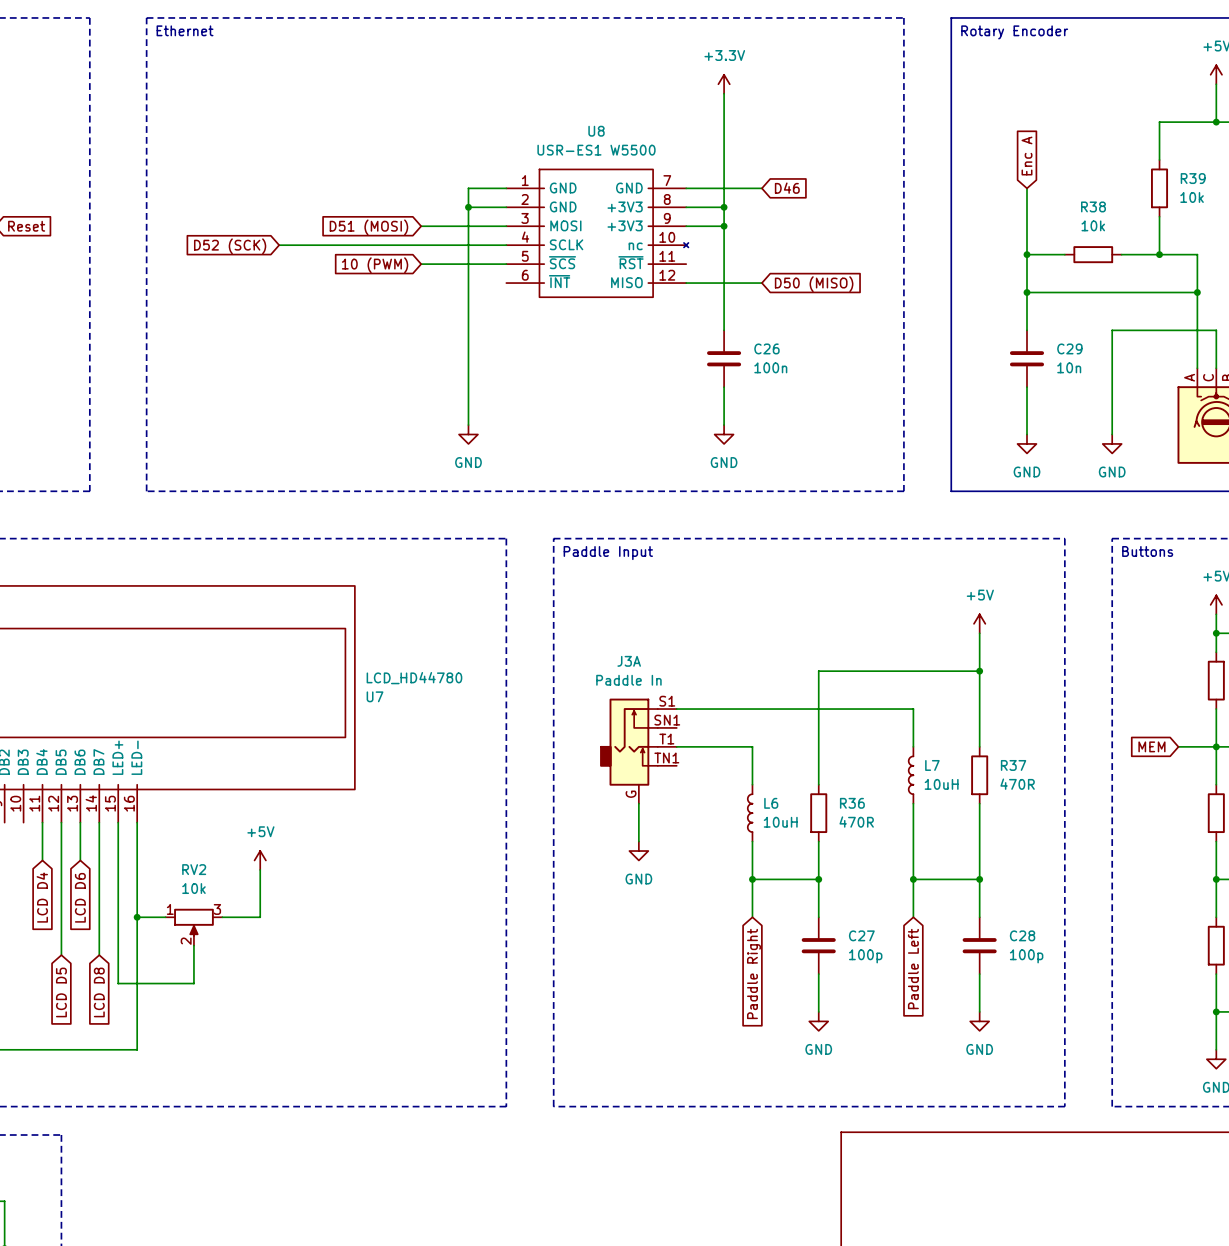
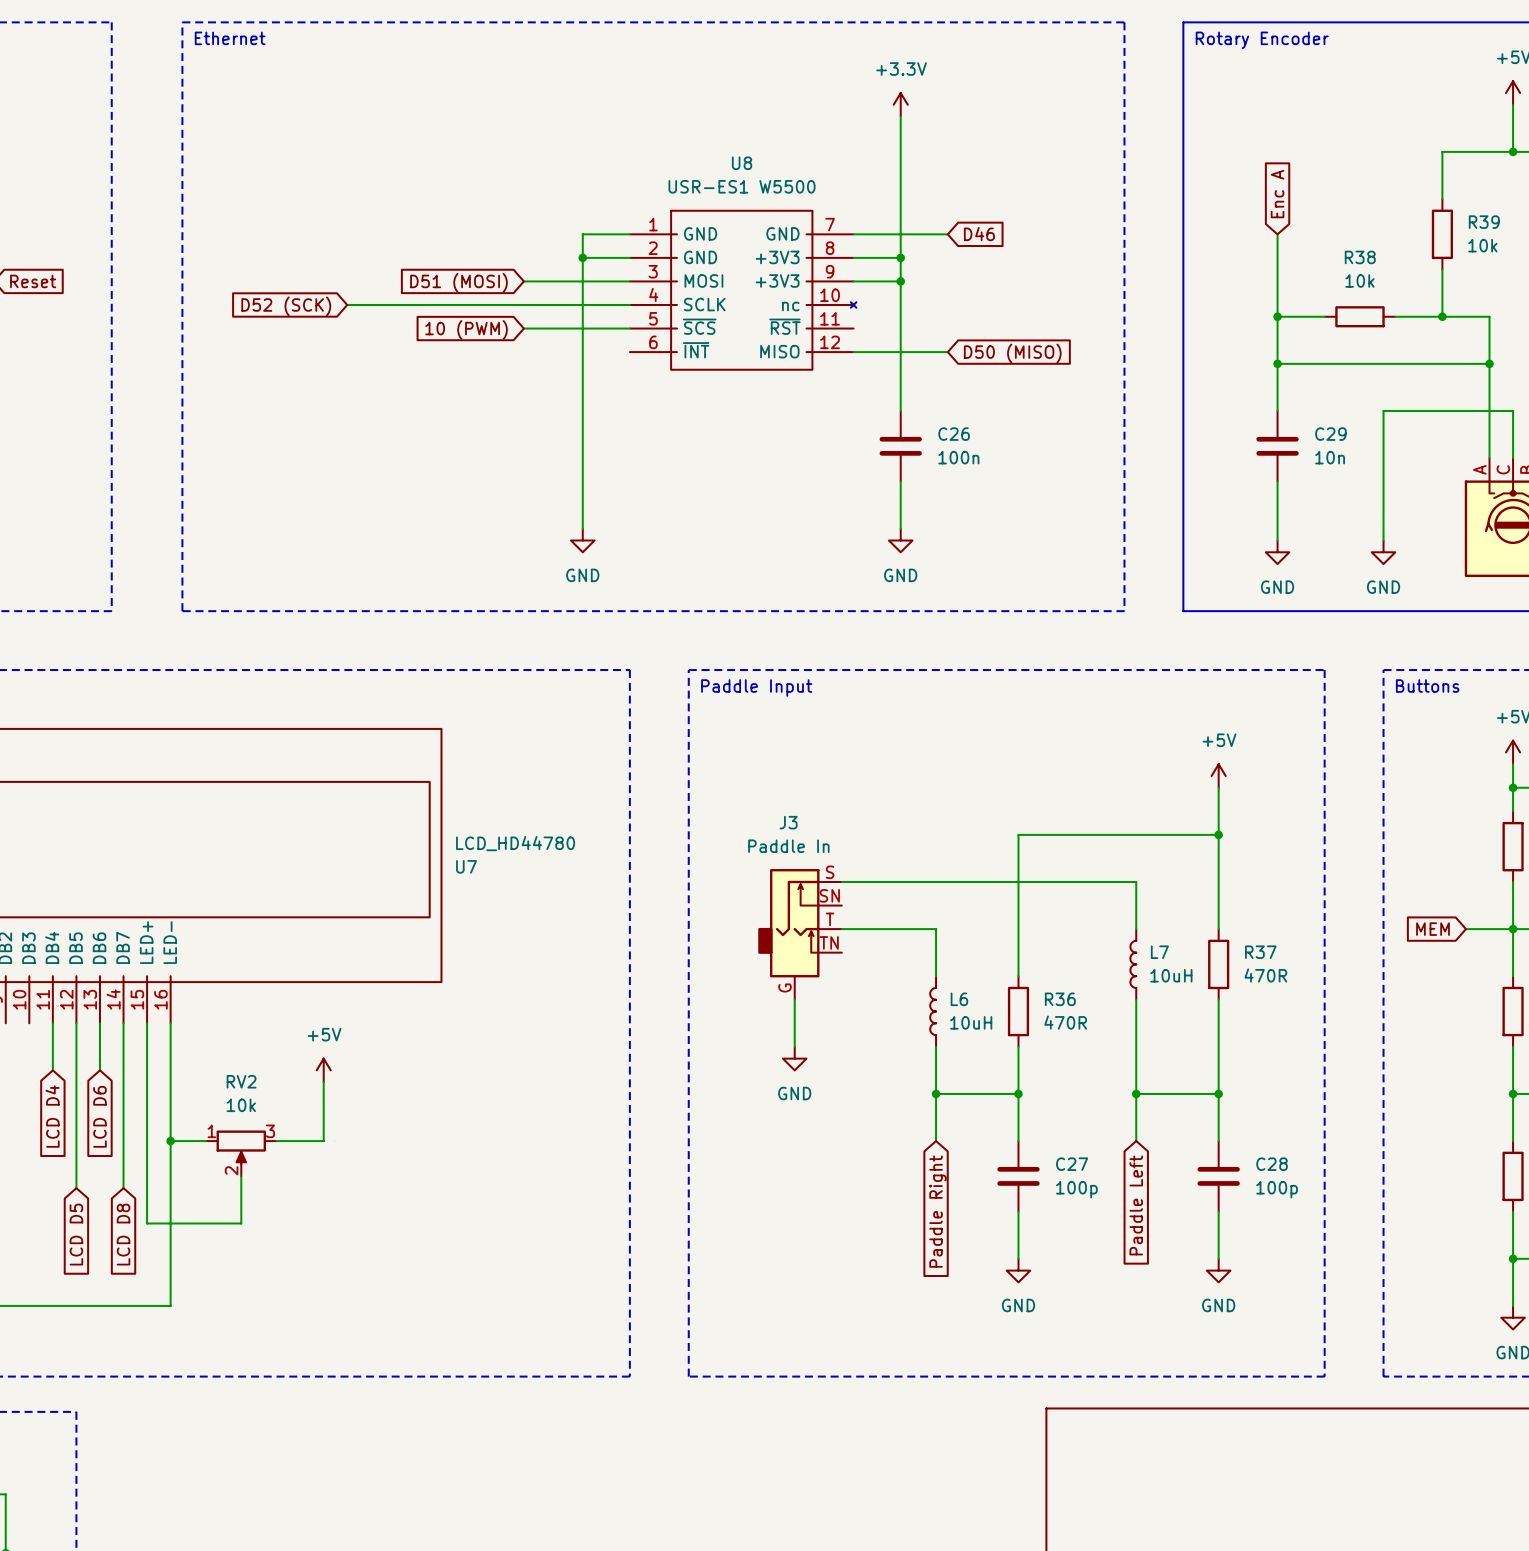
J3A: Paddle In (638, 751) -> none
J3: none -> Paddle In (800, 934)

